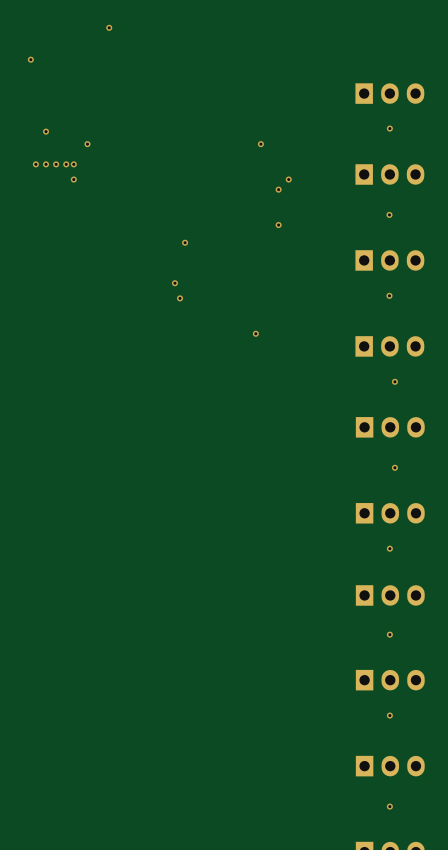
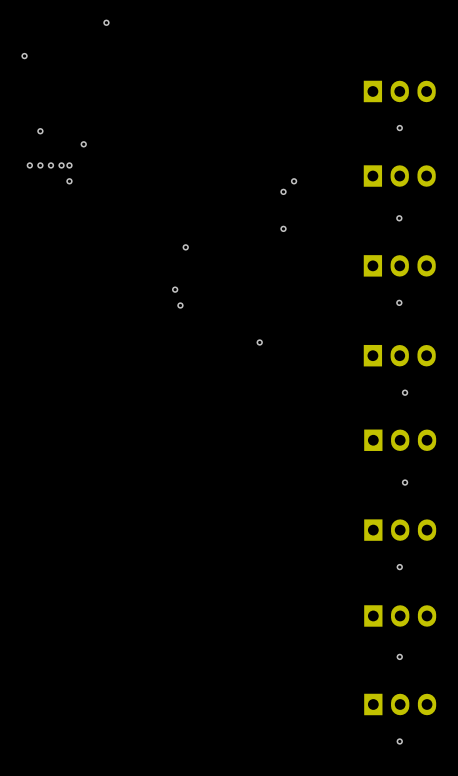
via: (260, 144) -> none

